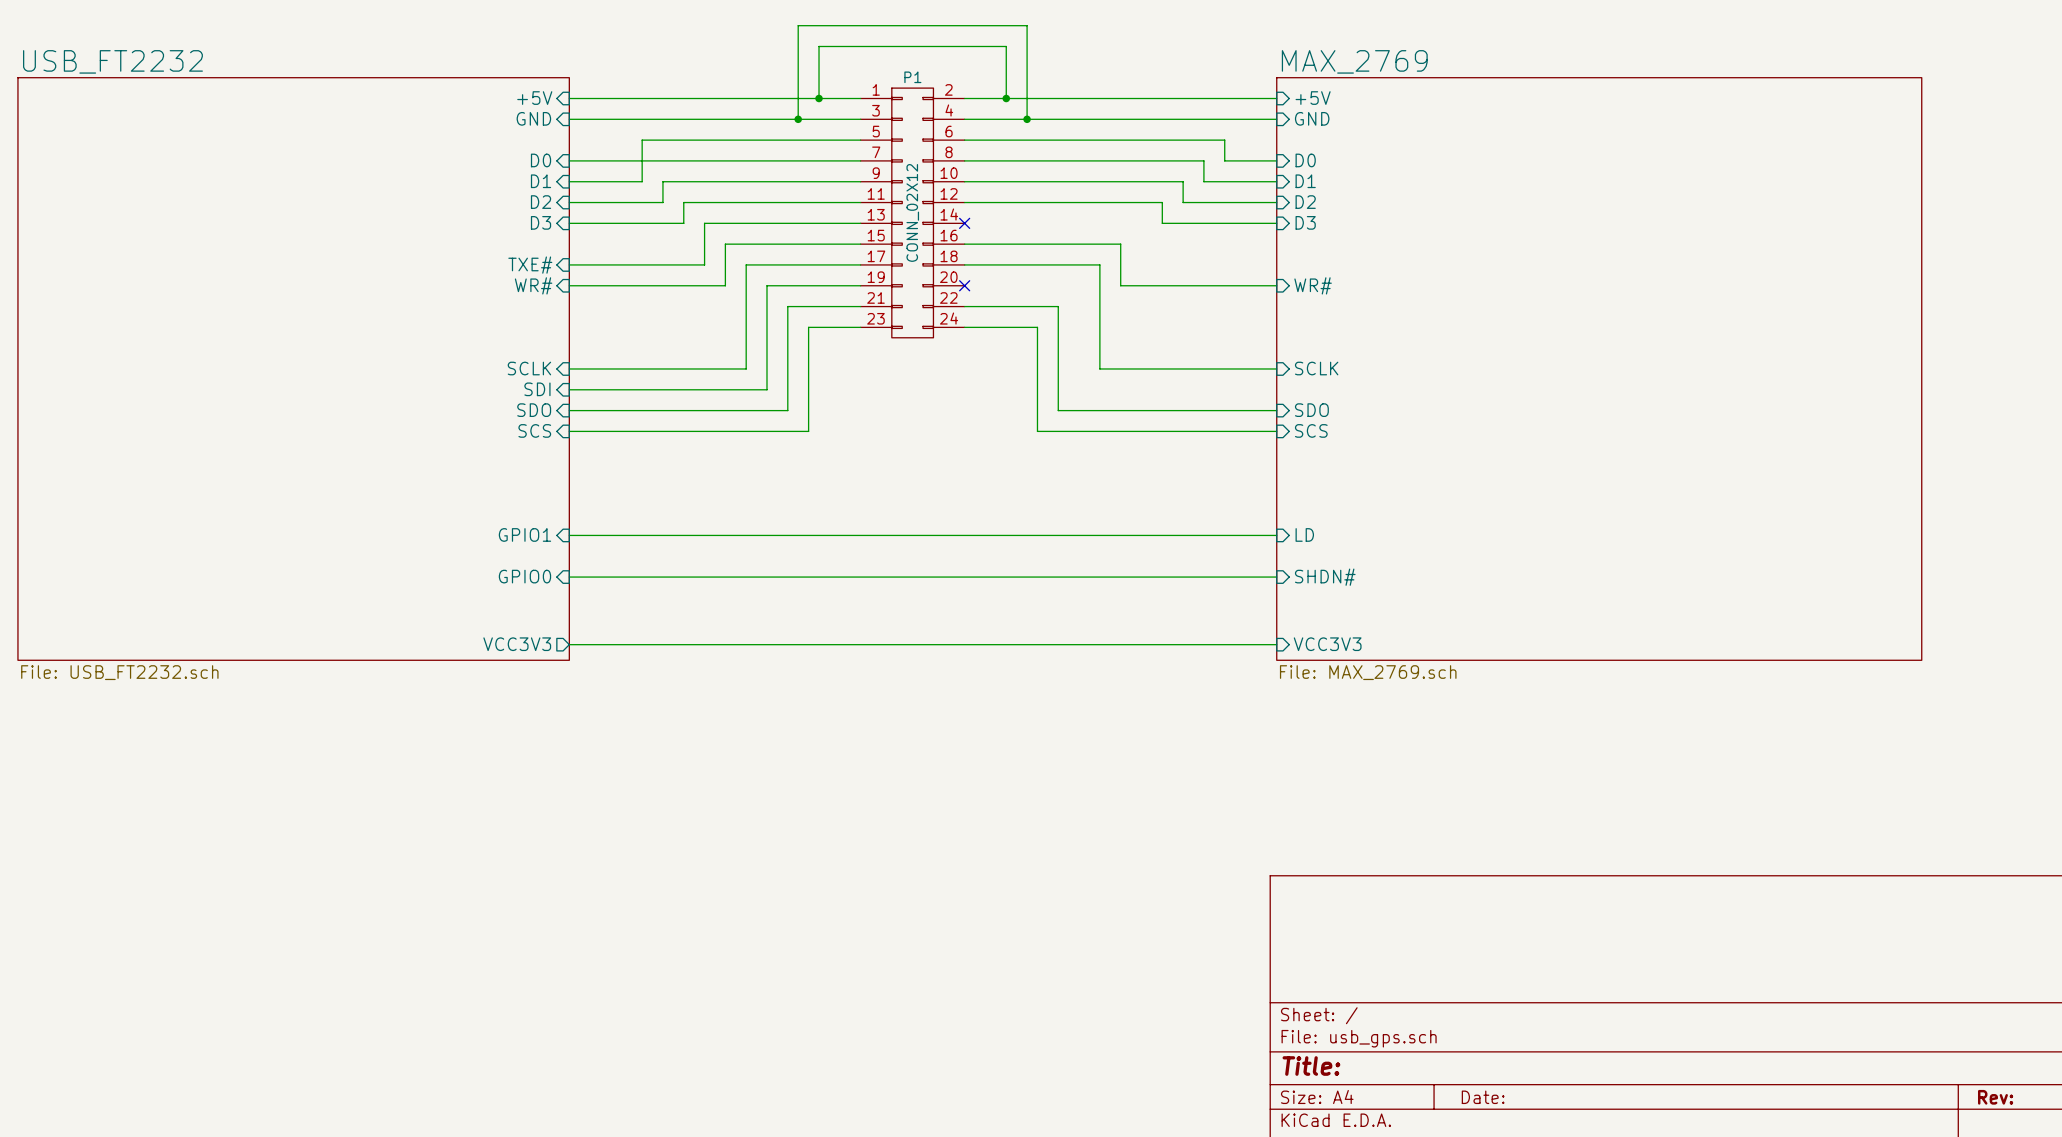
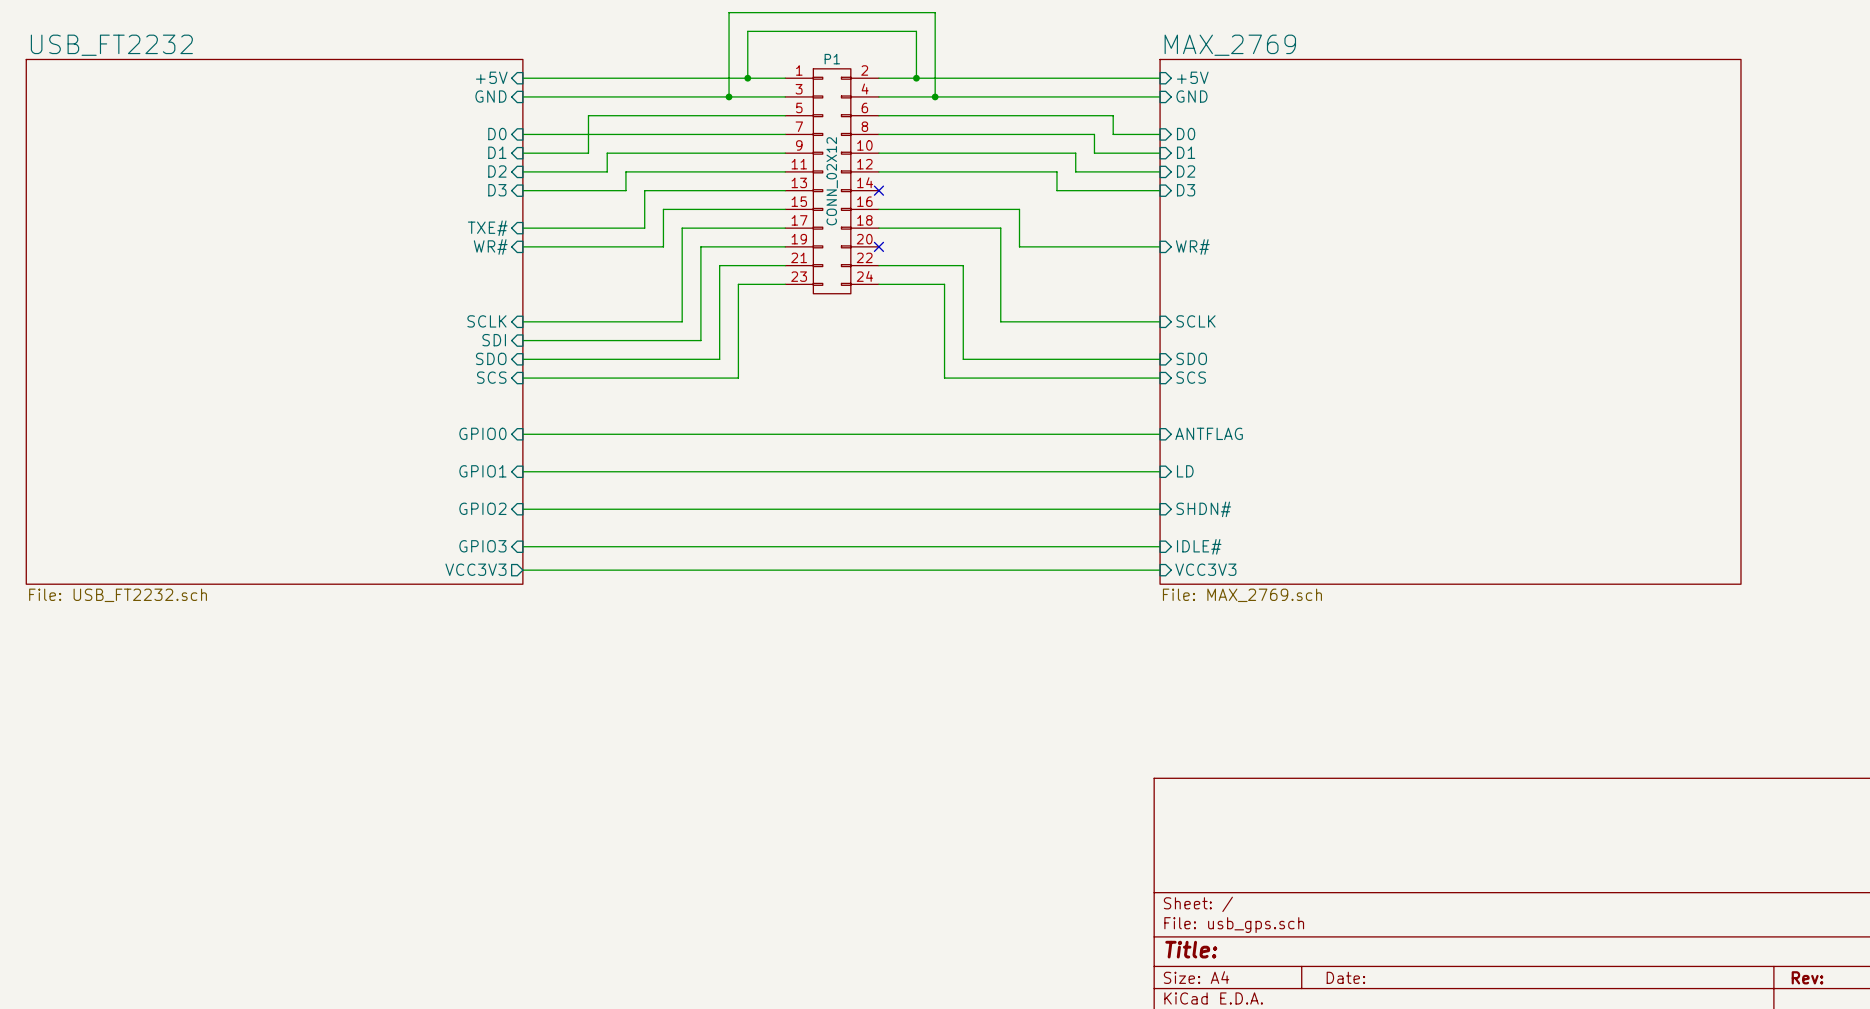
sheet pin: none -> GPIO0 (482, 433)
wire: none -> (522, 434) (1160, 434)
sheet pin: none -> ANTFLAG (1209, 433)
sheet pin: GPIO0 (524, 576) -> GPIO2 (482, 508)
sheet pin: none -> GPIO3 (482, 546)
wire: none -> (522, 546) (1160, 546)
sheet pin: none -> IDLE# (1199, 546)

